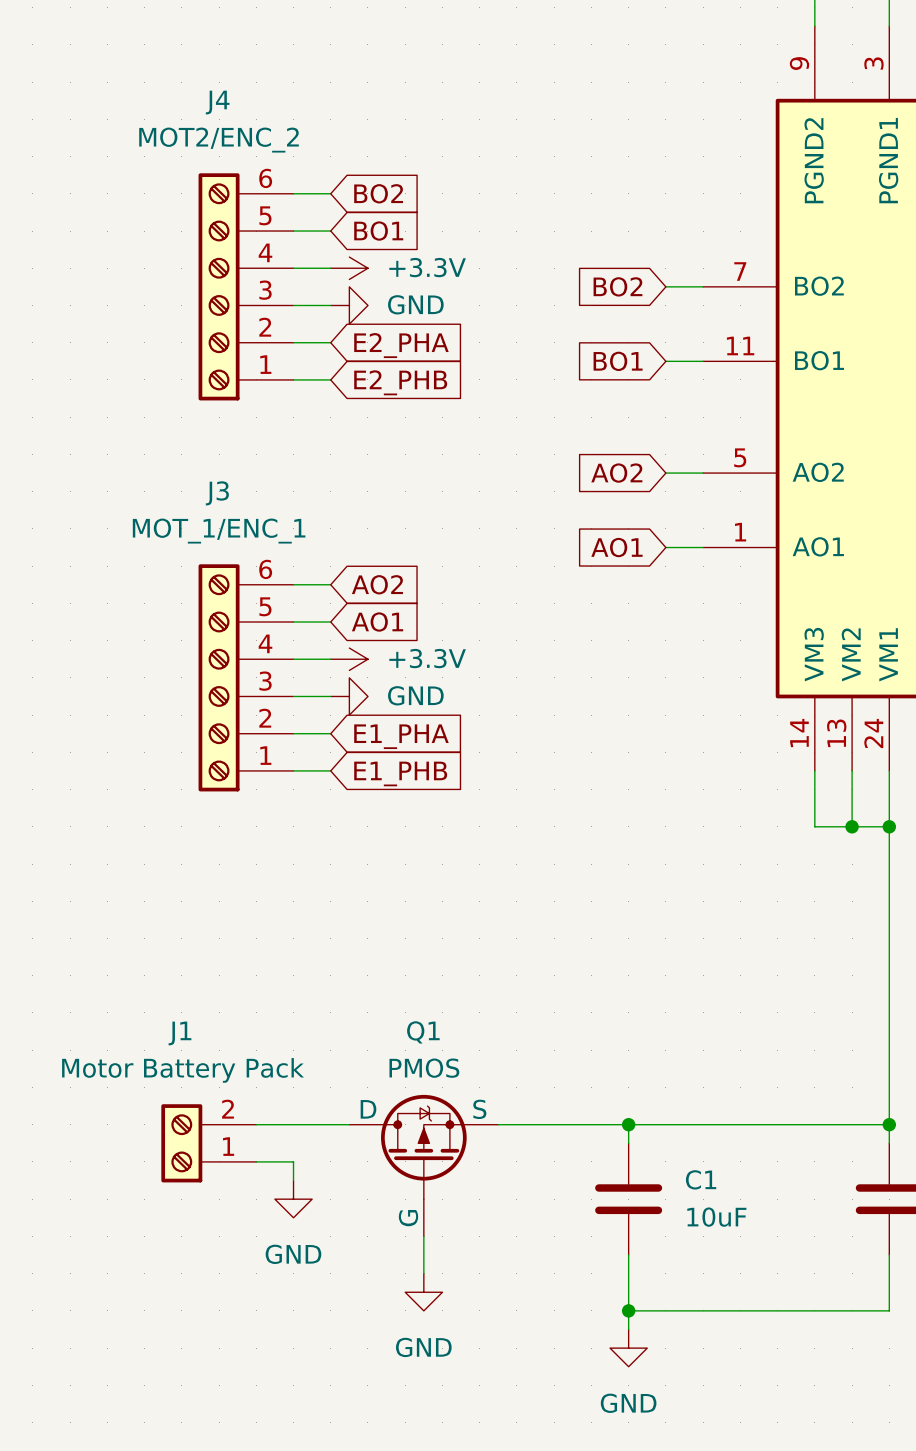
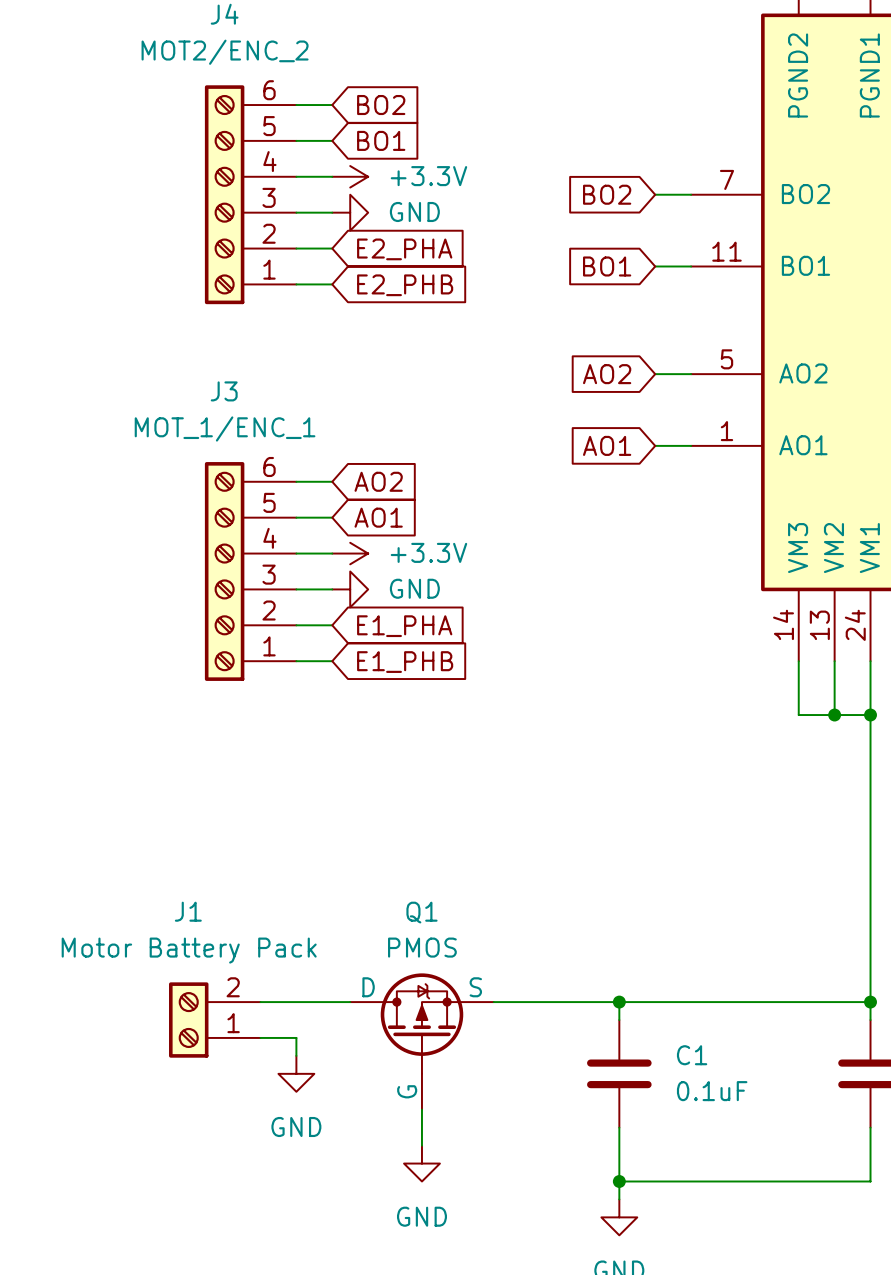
C1 value: 10uF (716, 1217) -> 0.1uF (712, 1091)

